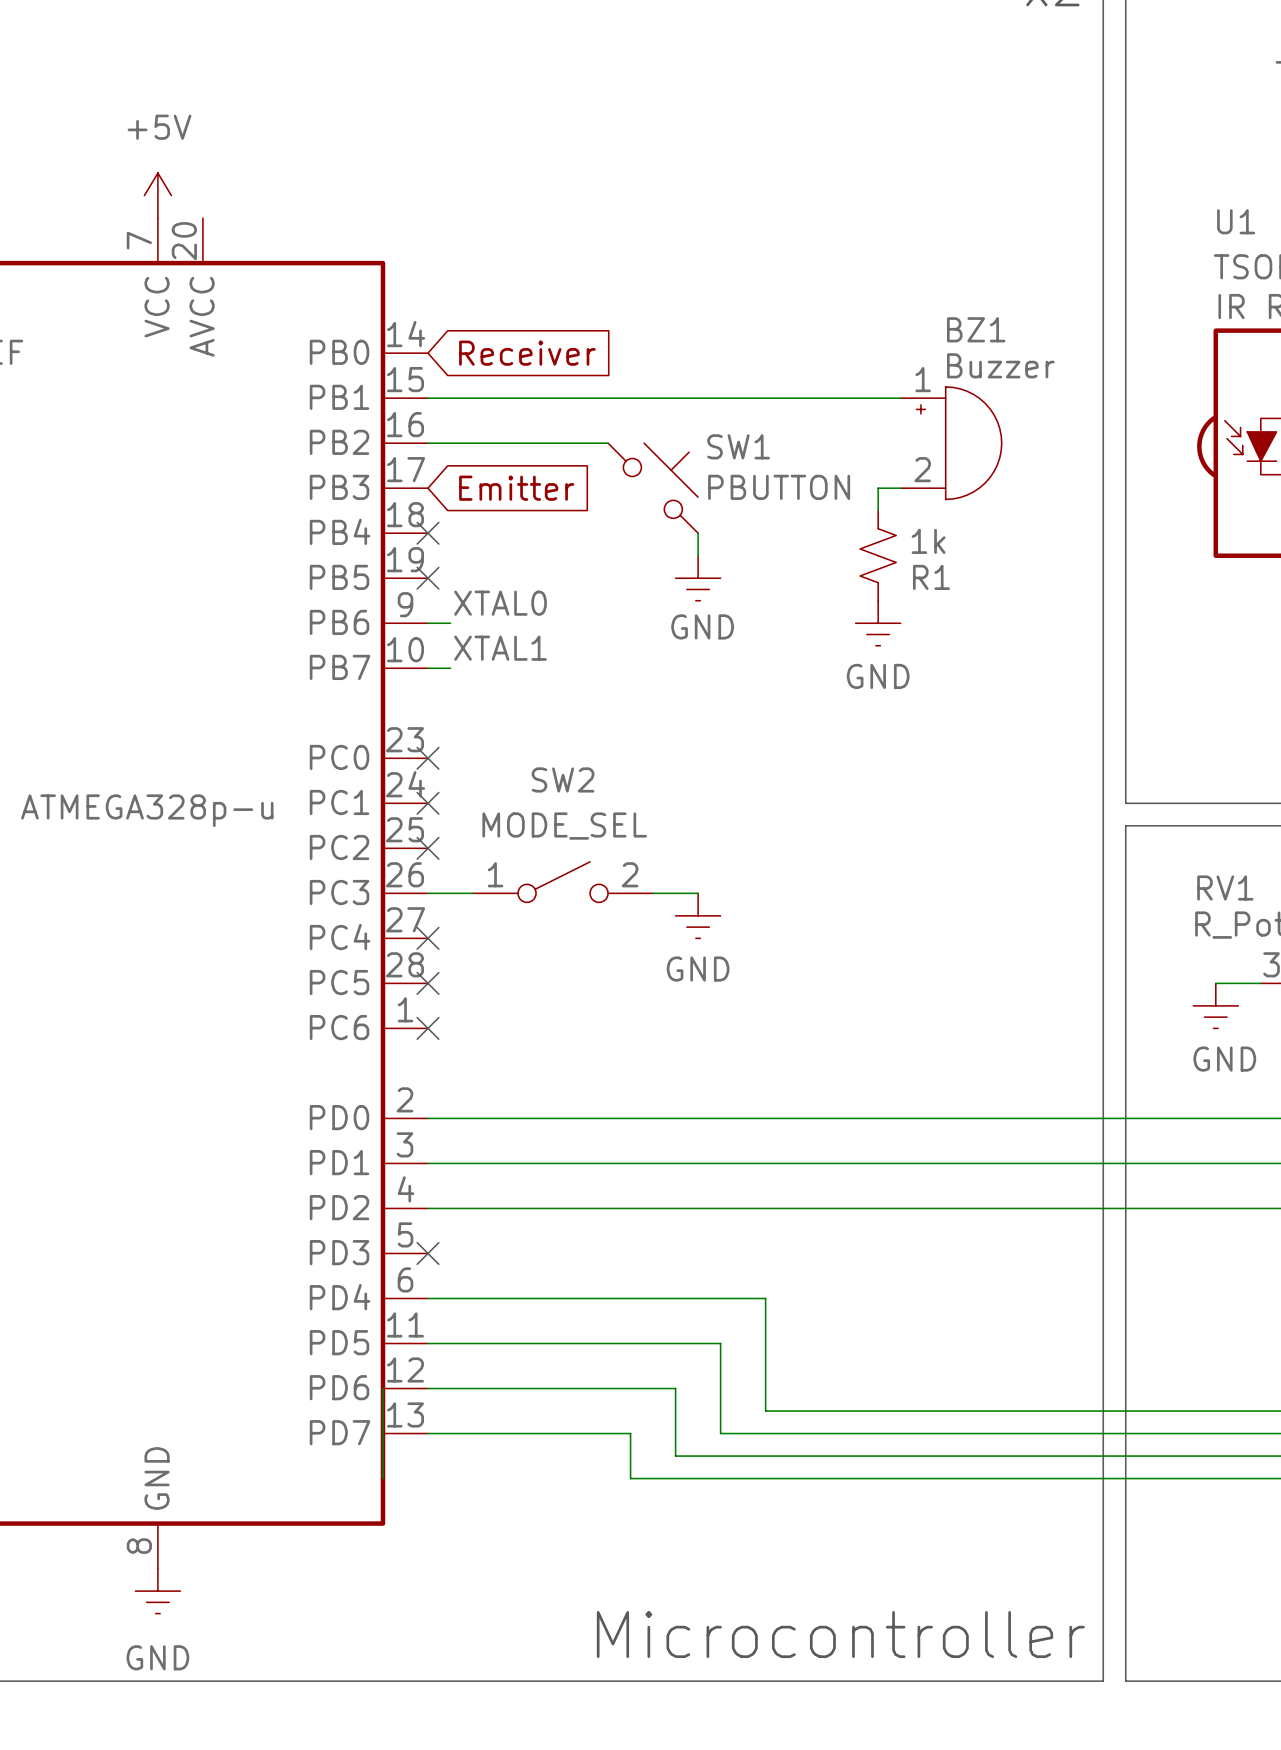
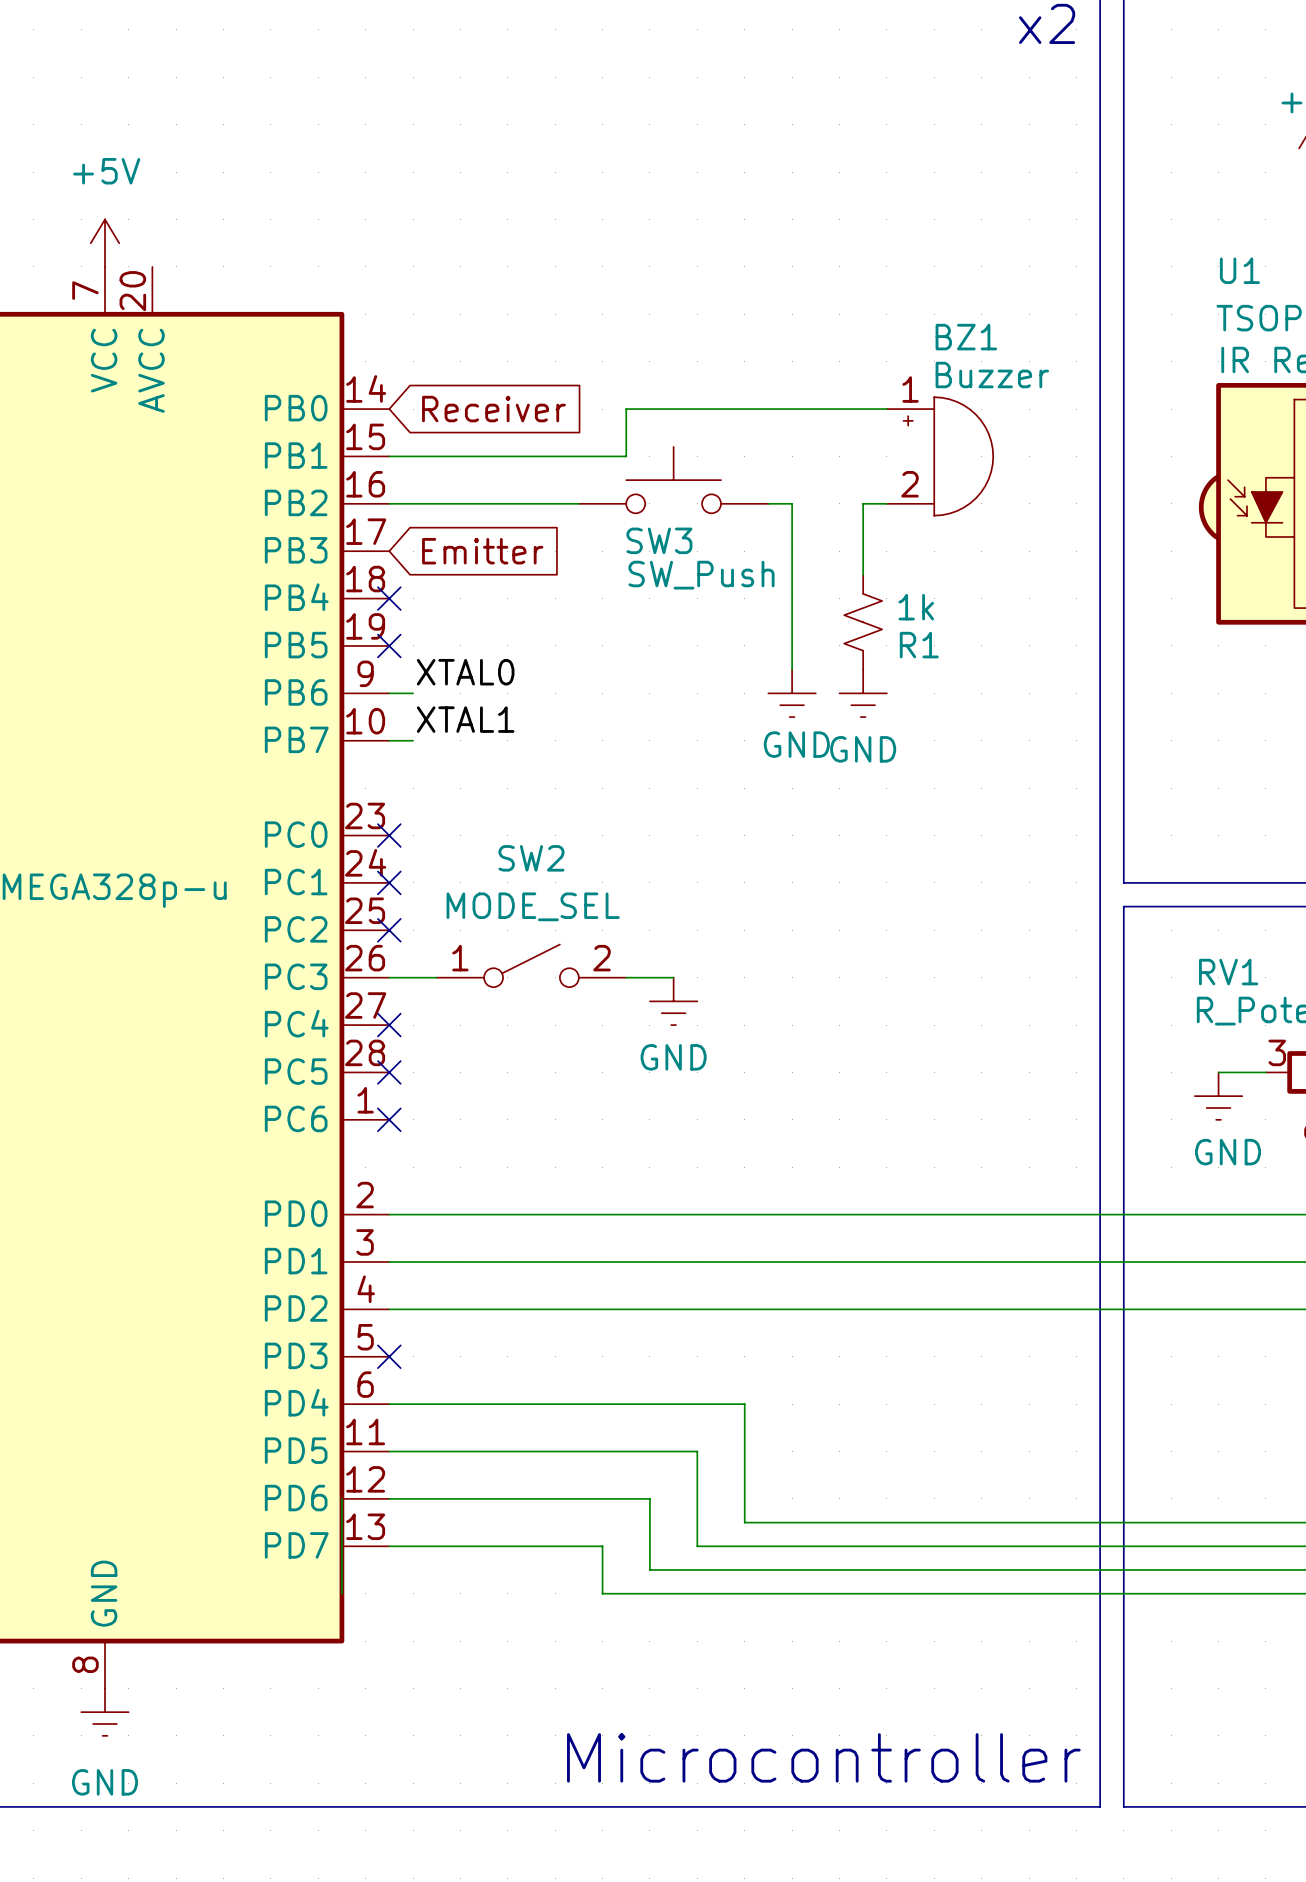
wire: (653, 398) (900, 398) -> (626, 456) (626, 409) (886, 409)
SW3: none -> SW_Push (673, 480)
wire: none -> (768, 503) (792, 503) (792, 669)
BZ1 position: (951, 443) -> (940, 456)
SW1: PBUTTON (653, 488) -> none
wire: (878, 488) (900, 488) -> (863, 551) (863, 503) (886, 503)
wire: (698, 533) (698, 555) -> none
power symbol position: GND (698, 578) -> GND (792, 693)

